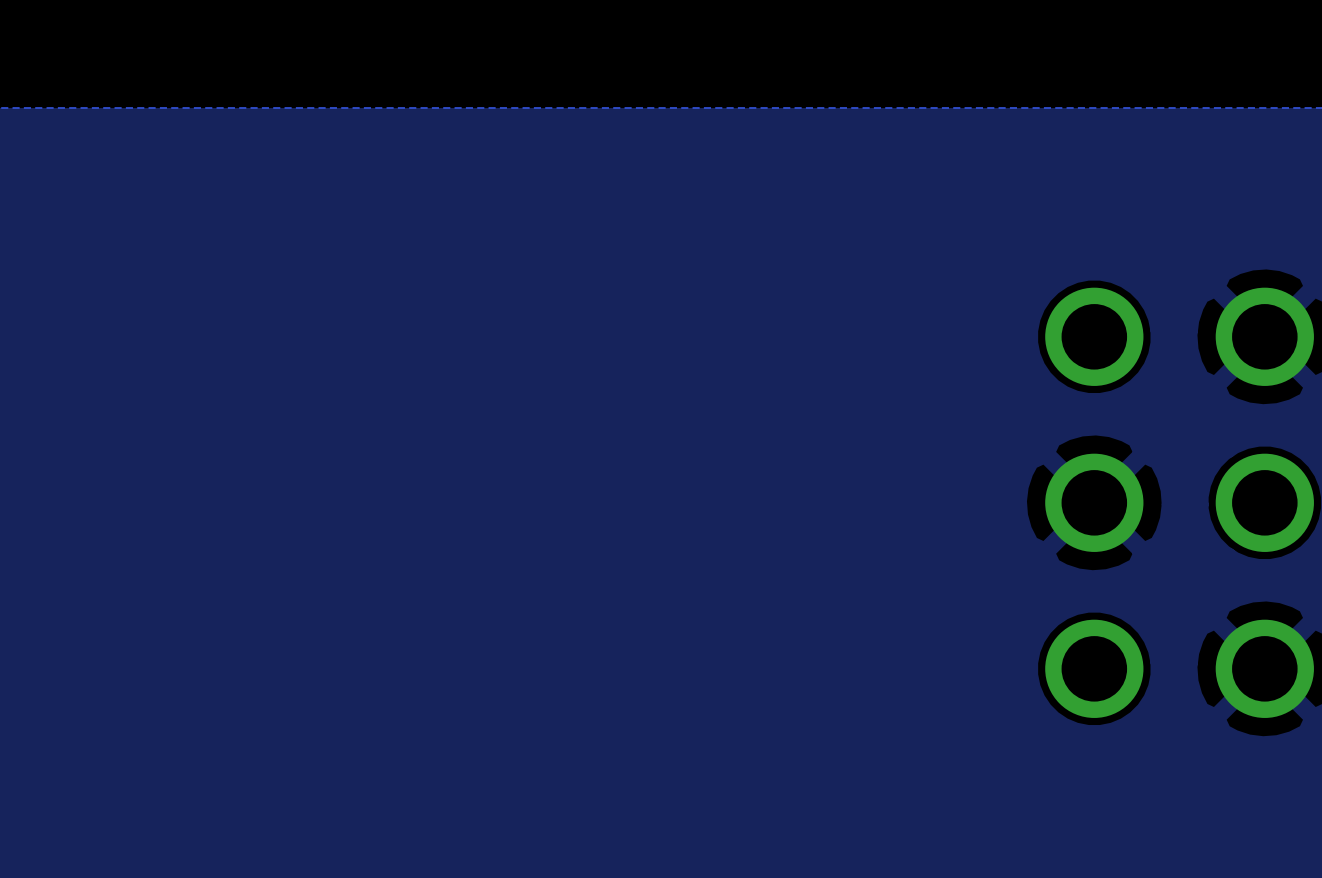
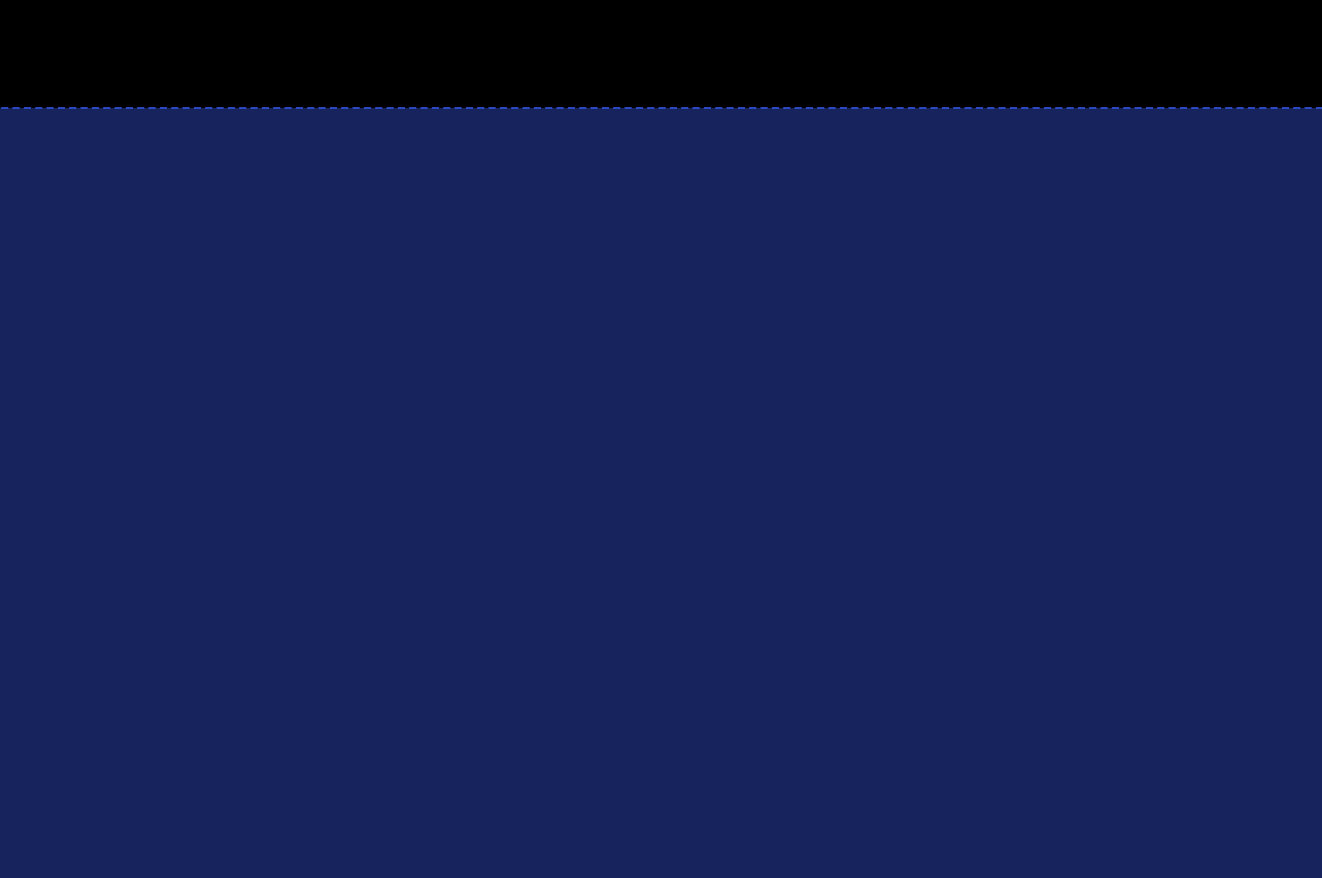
part: (1179, 502) -> none

